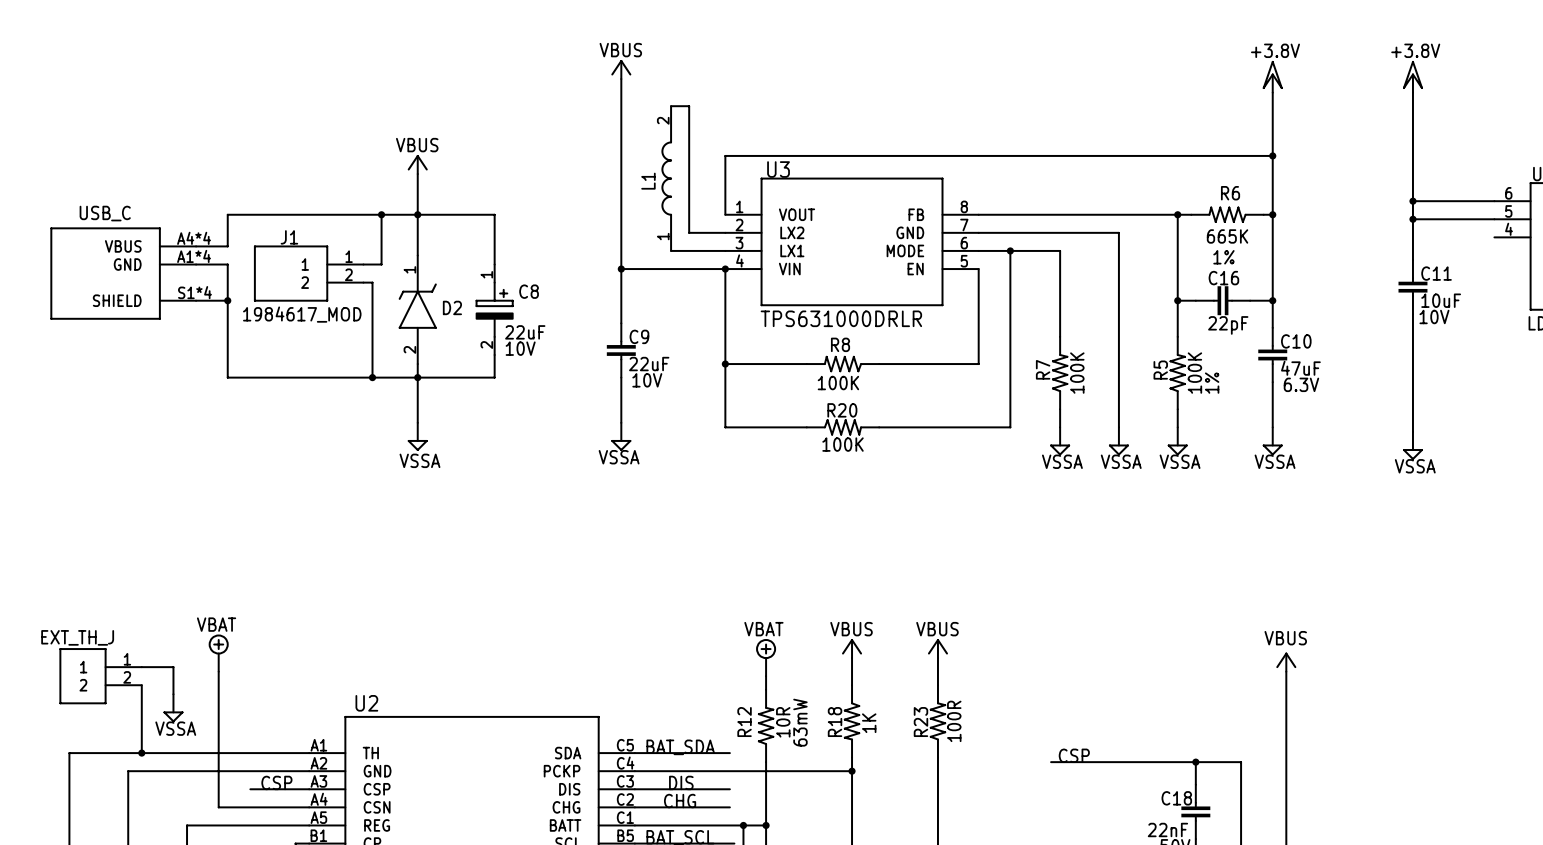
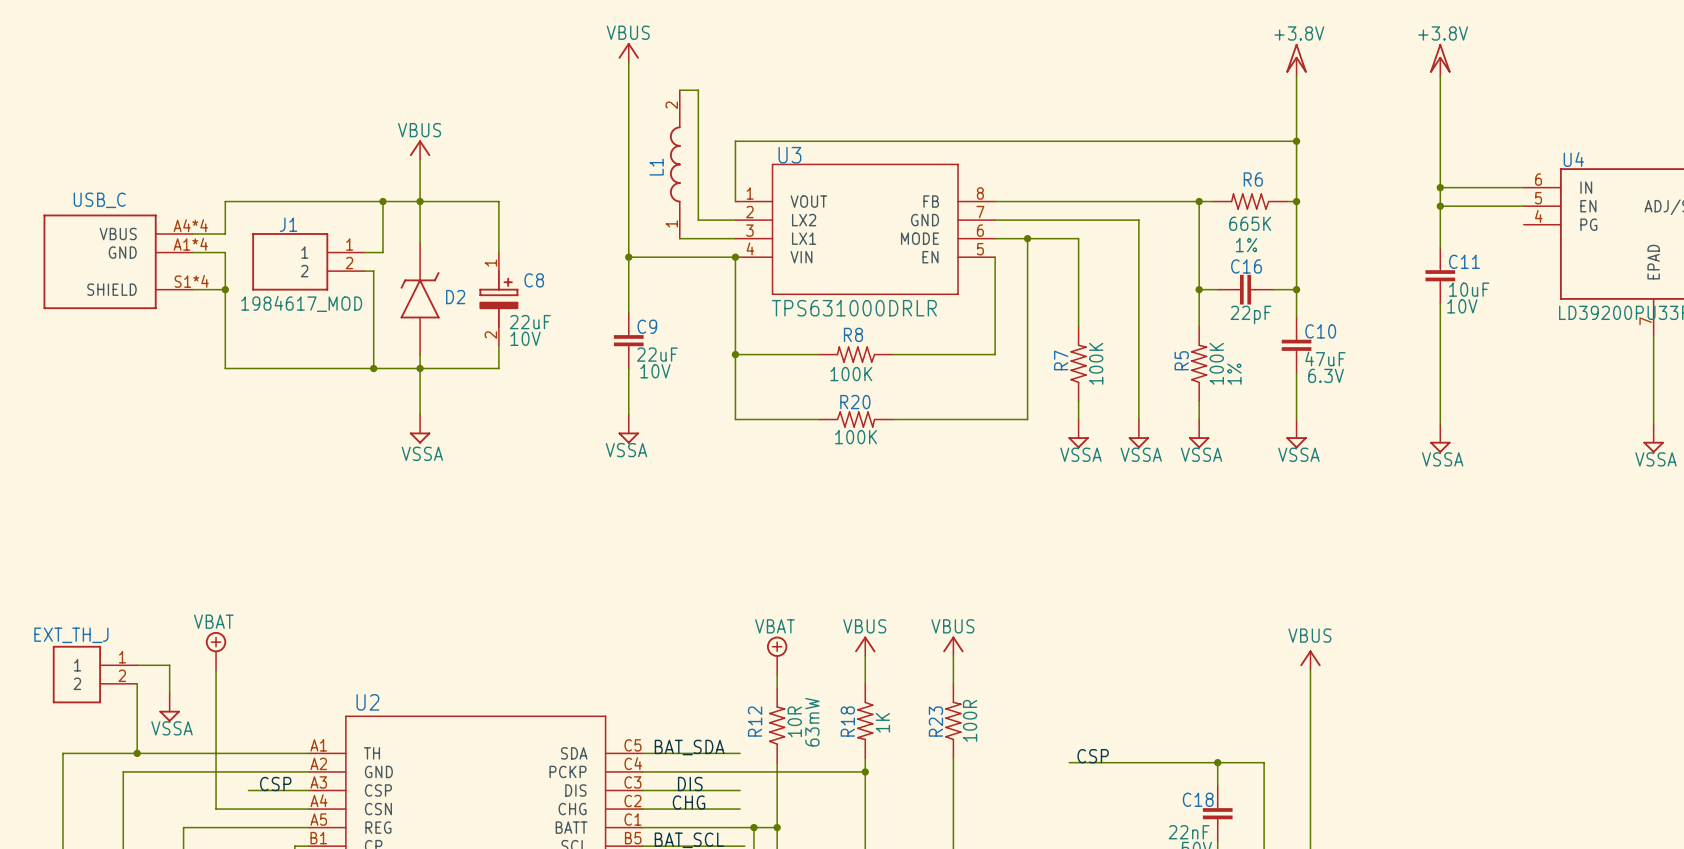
D2 pin number: 1 (409, 269) -> none
D2 pin number: 2 (409, 349) -> none

